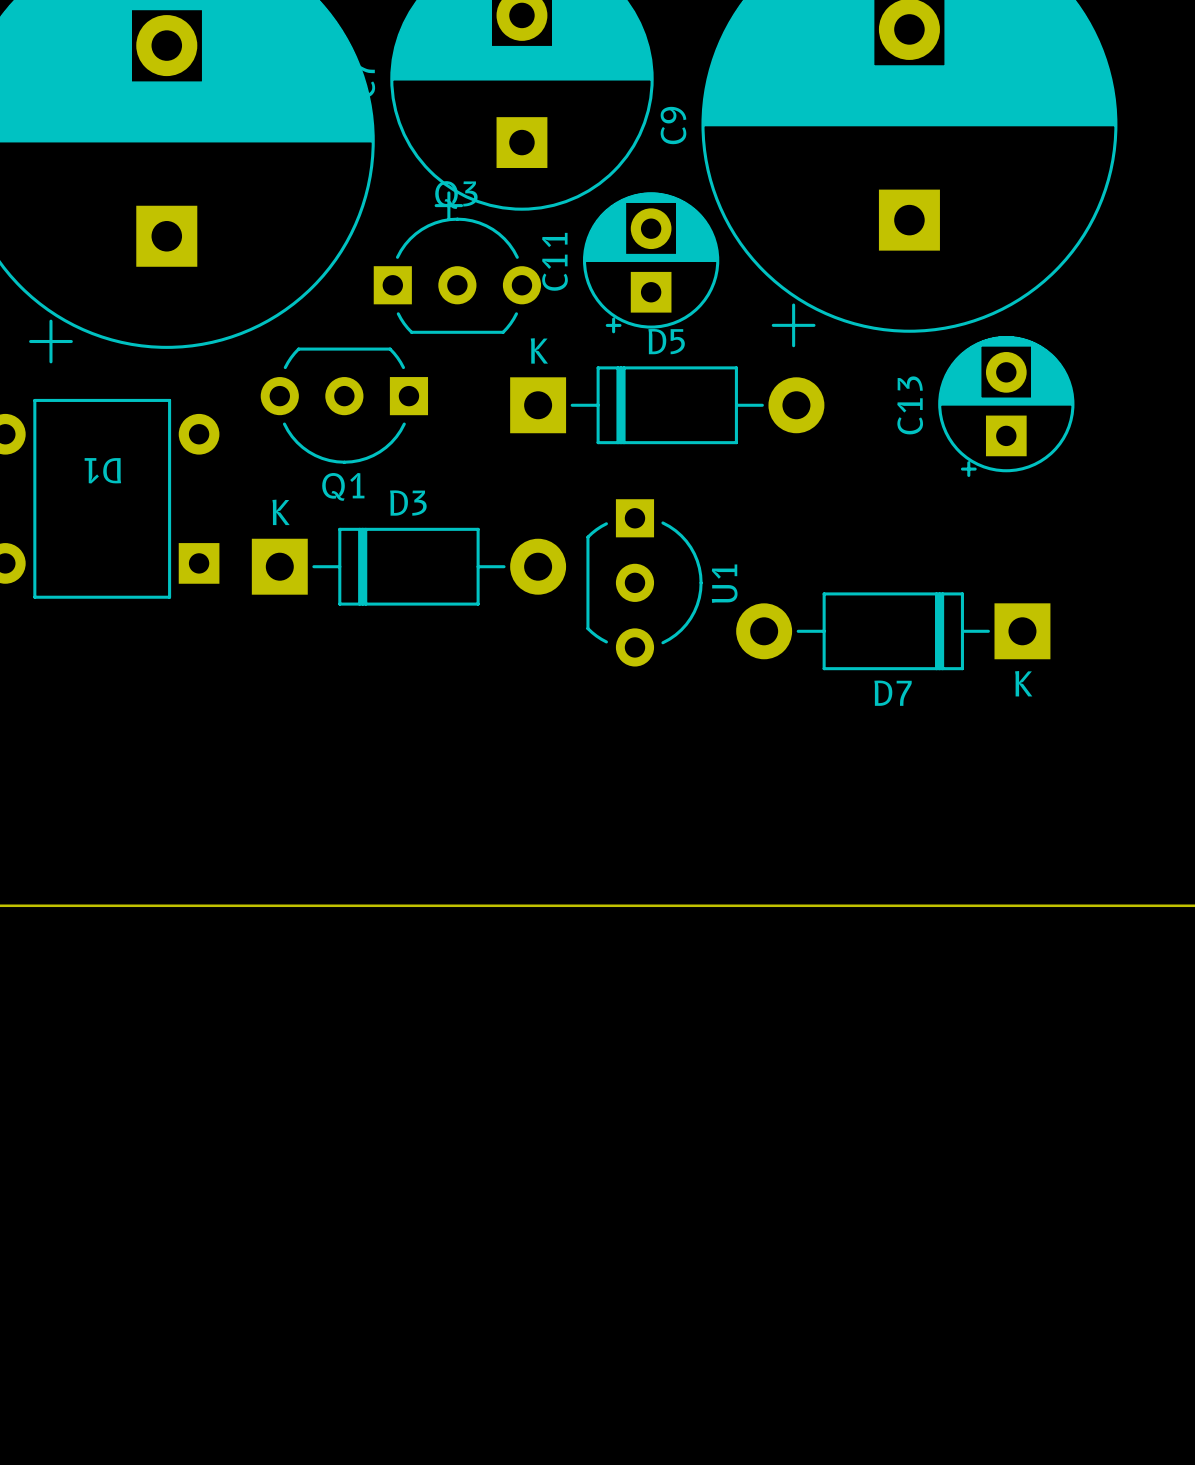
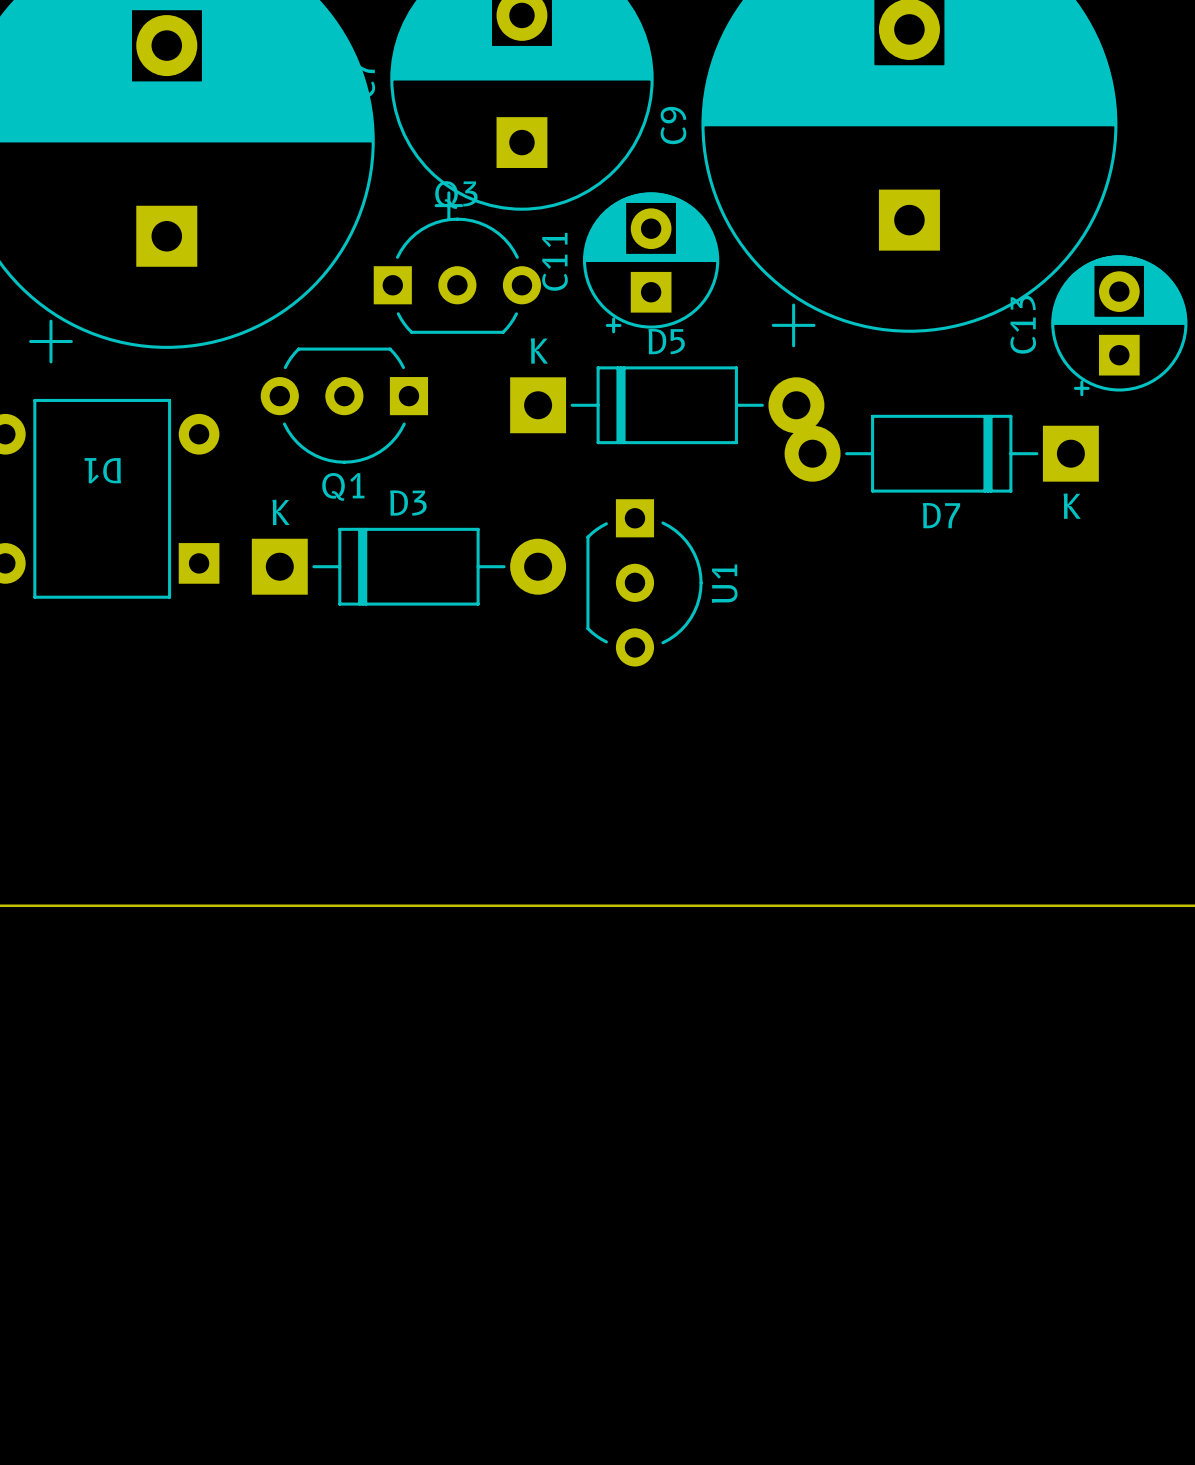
C13 position: (1006, 406) -> (1119, 325)
D7 position: (893, 631) -> (941, 453)

